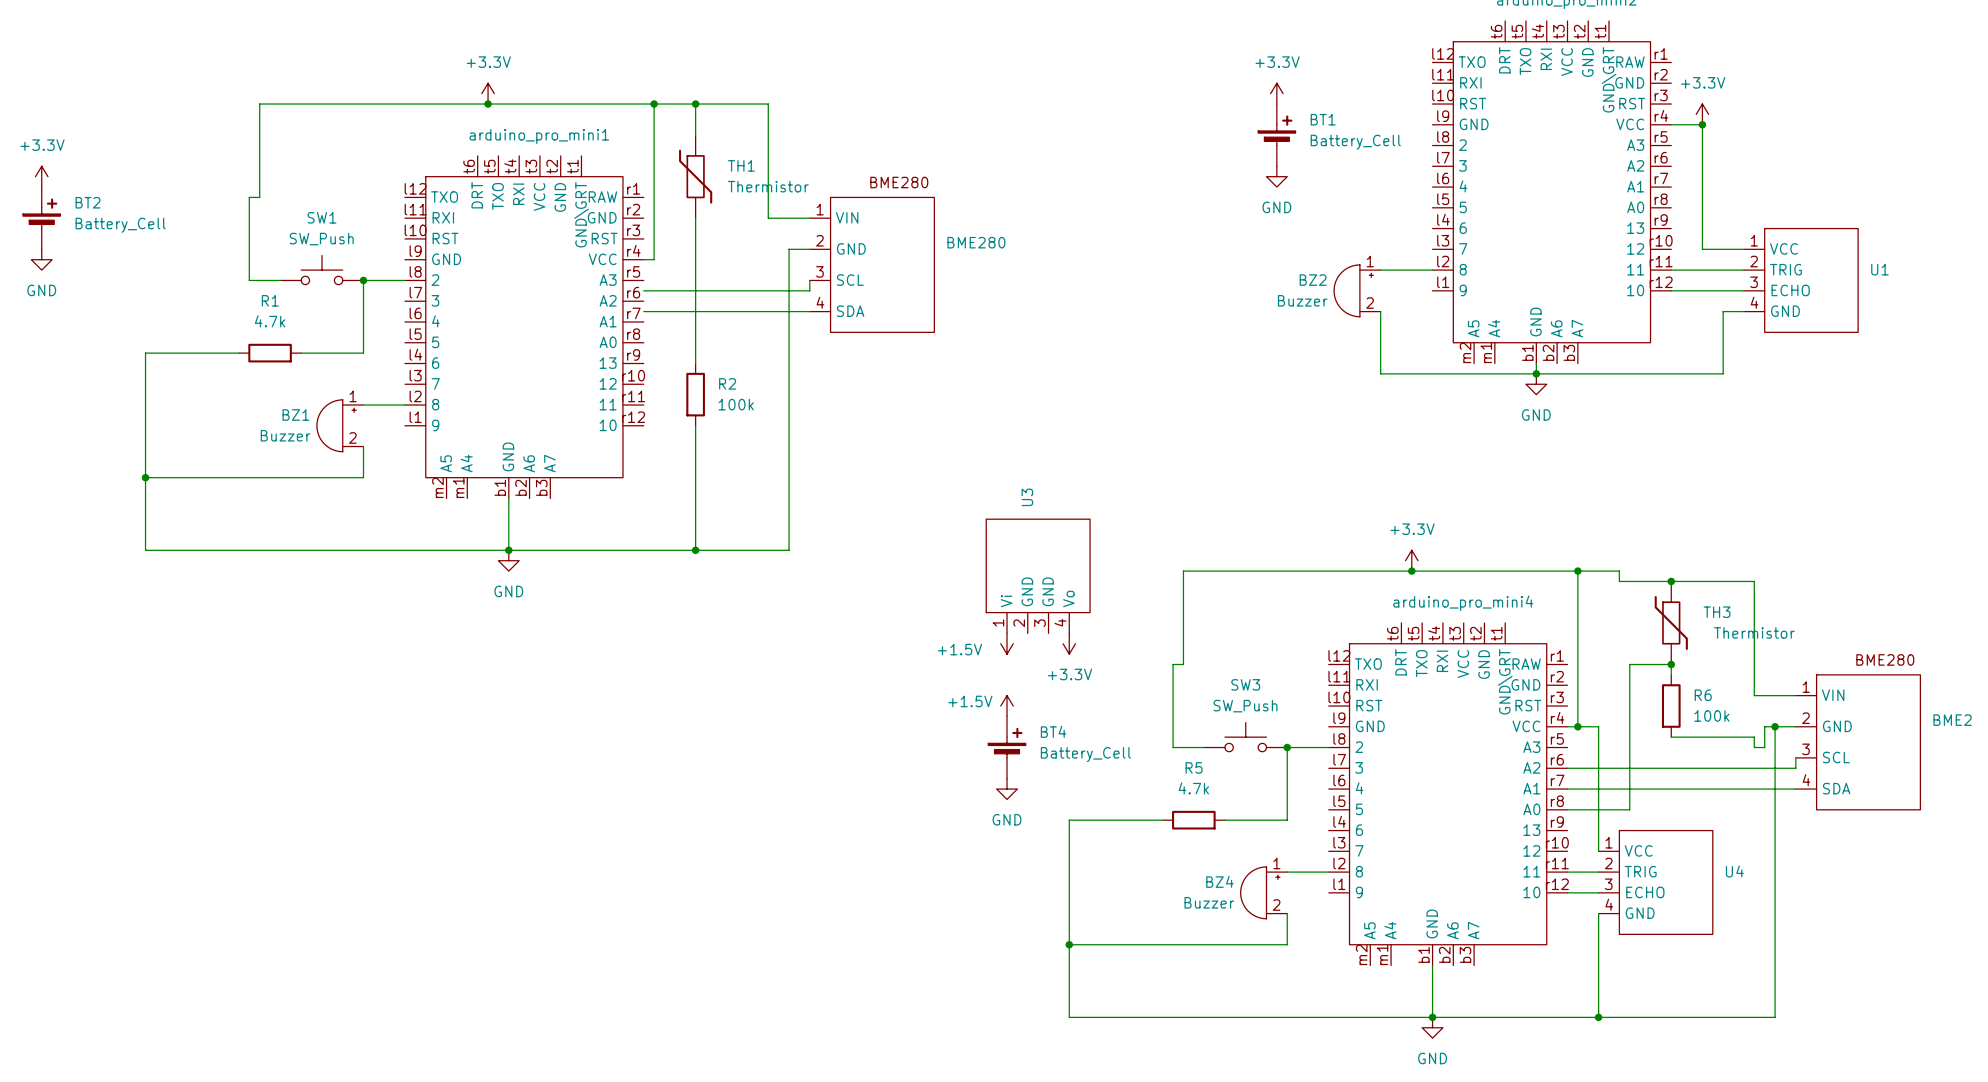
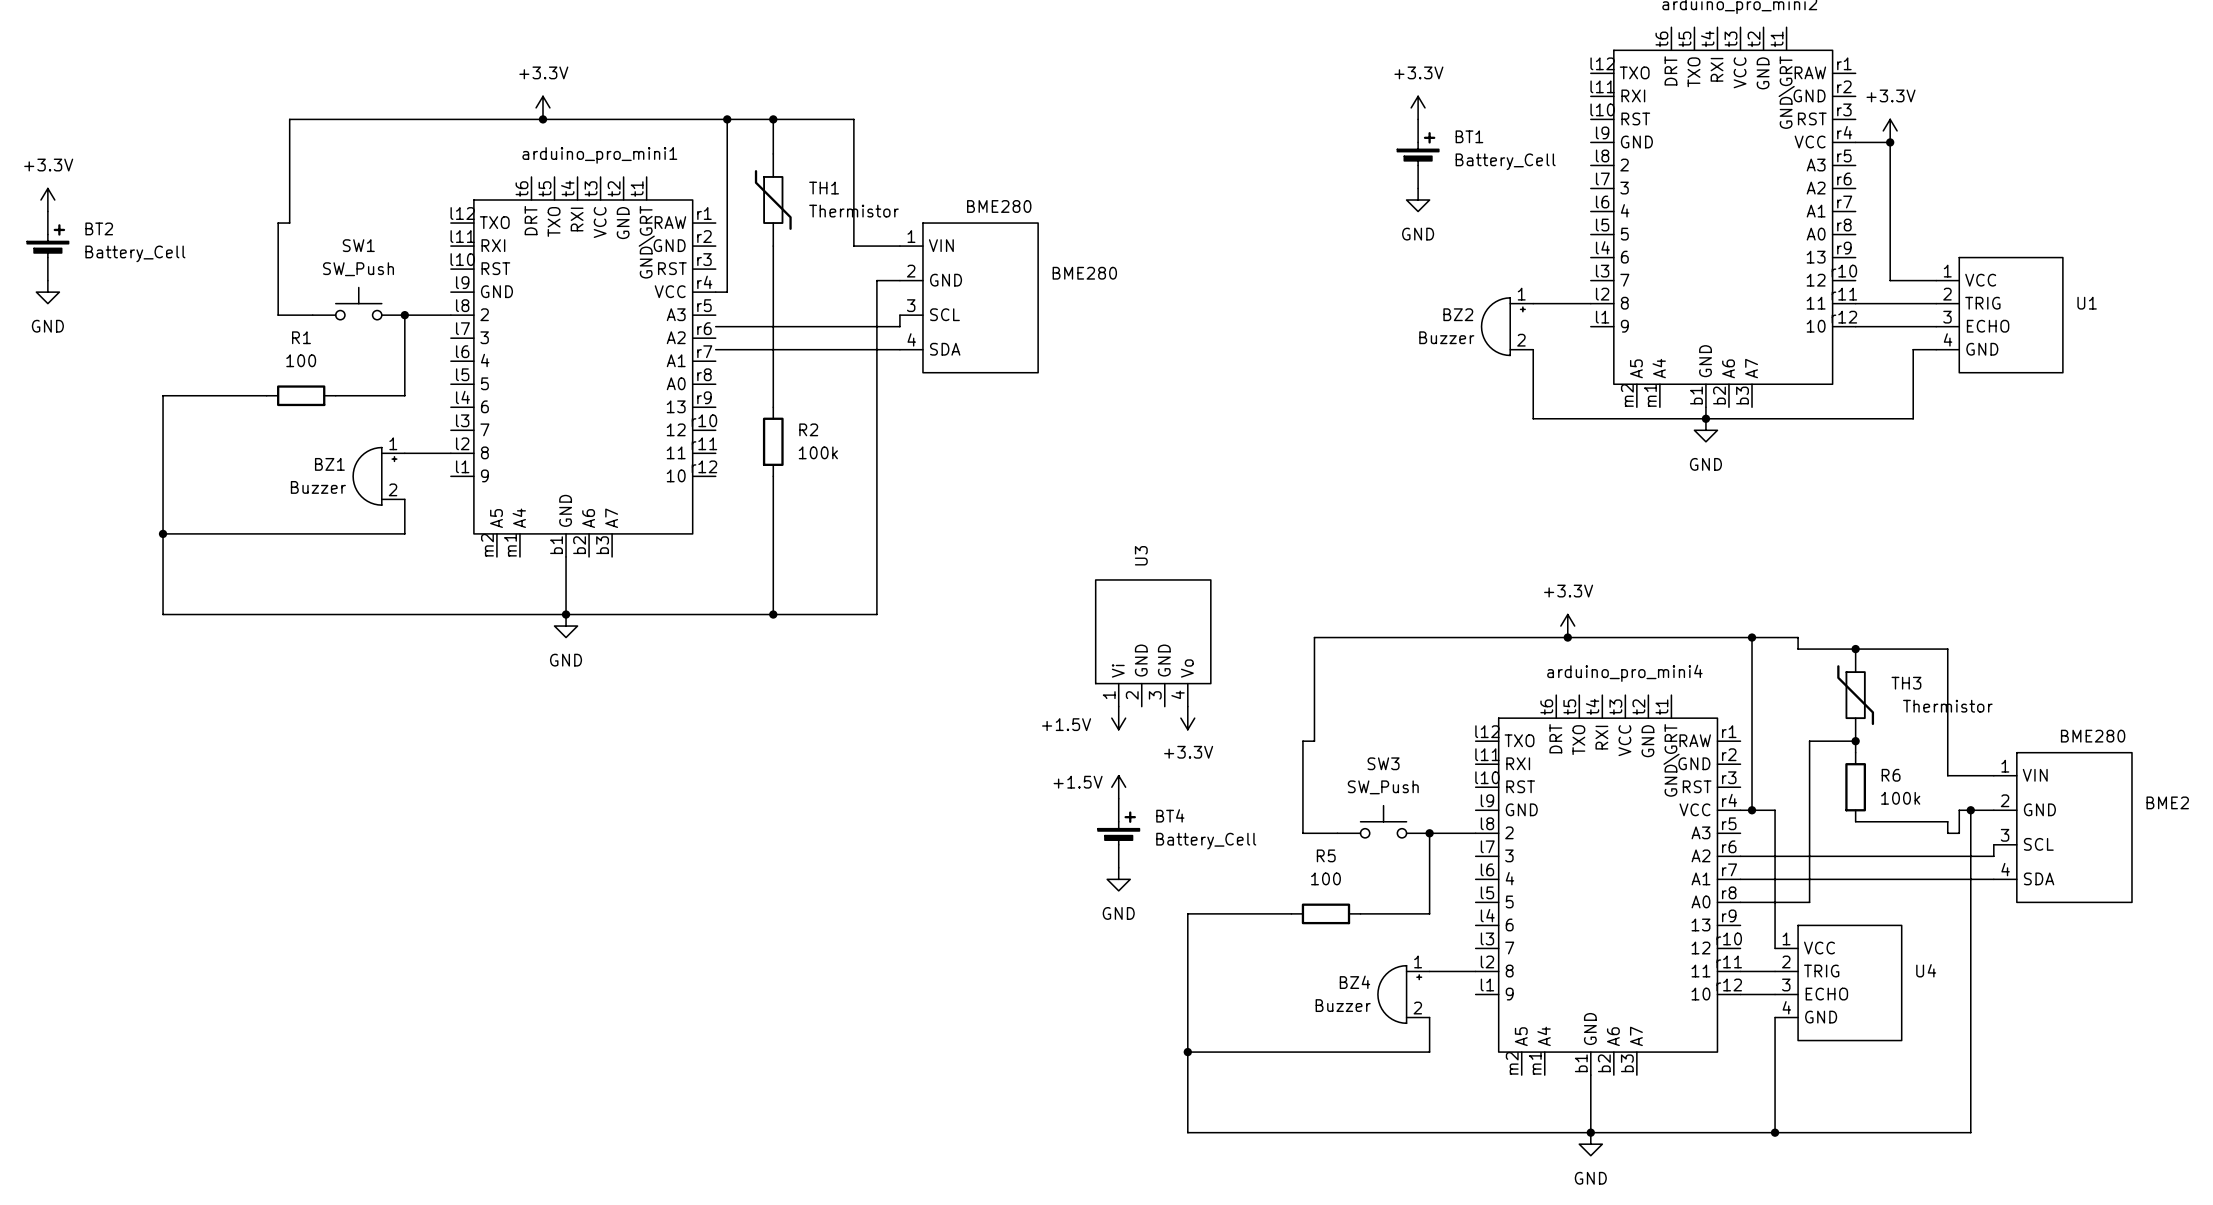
R1 value: 4.7k (270, 321) -> 100 (301, 360)
R5 value: 4.7k (1193, 788) -> 100 (1325, 878)

